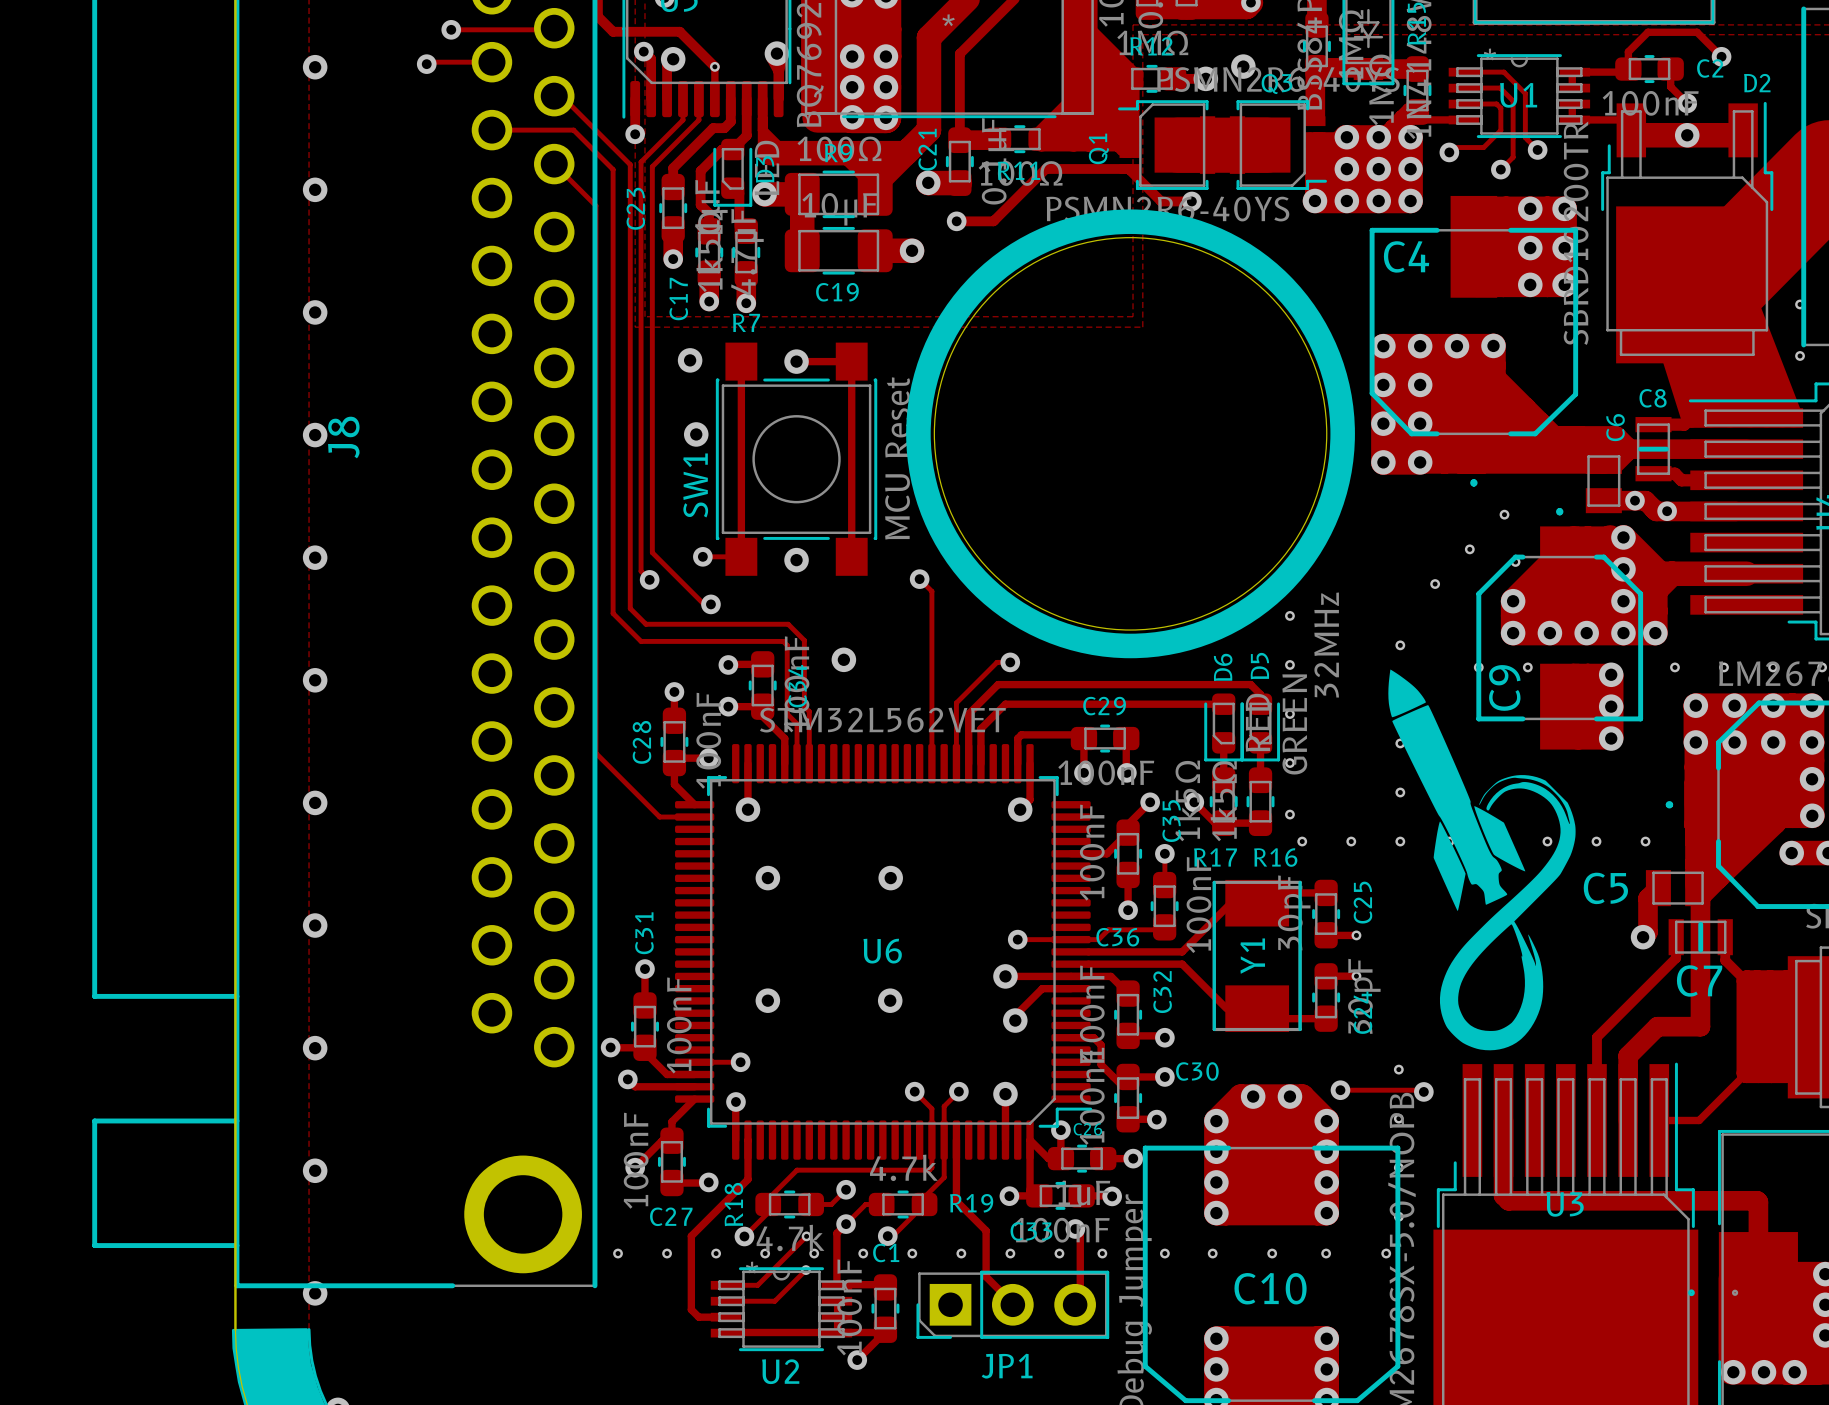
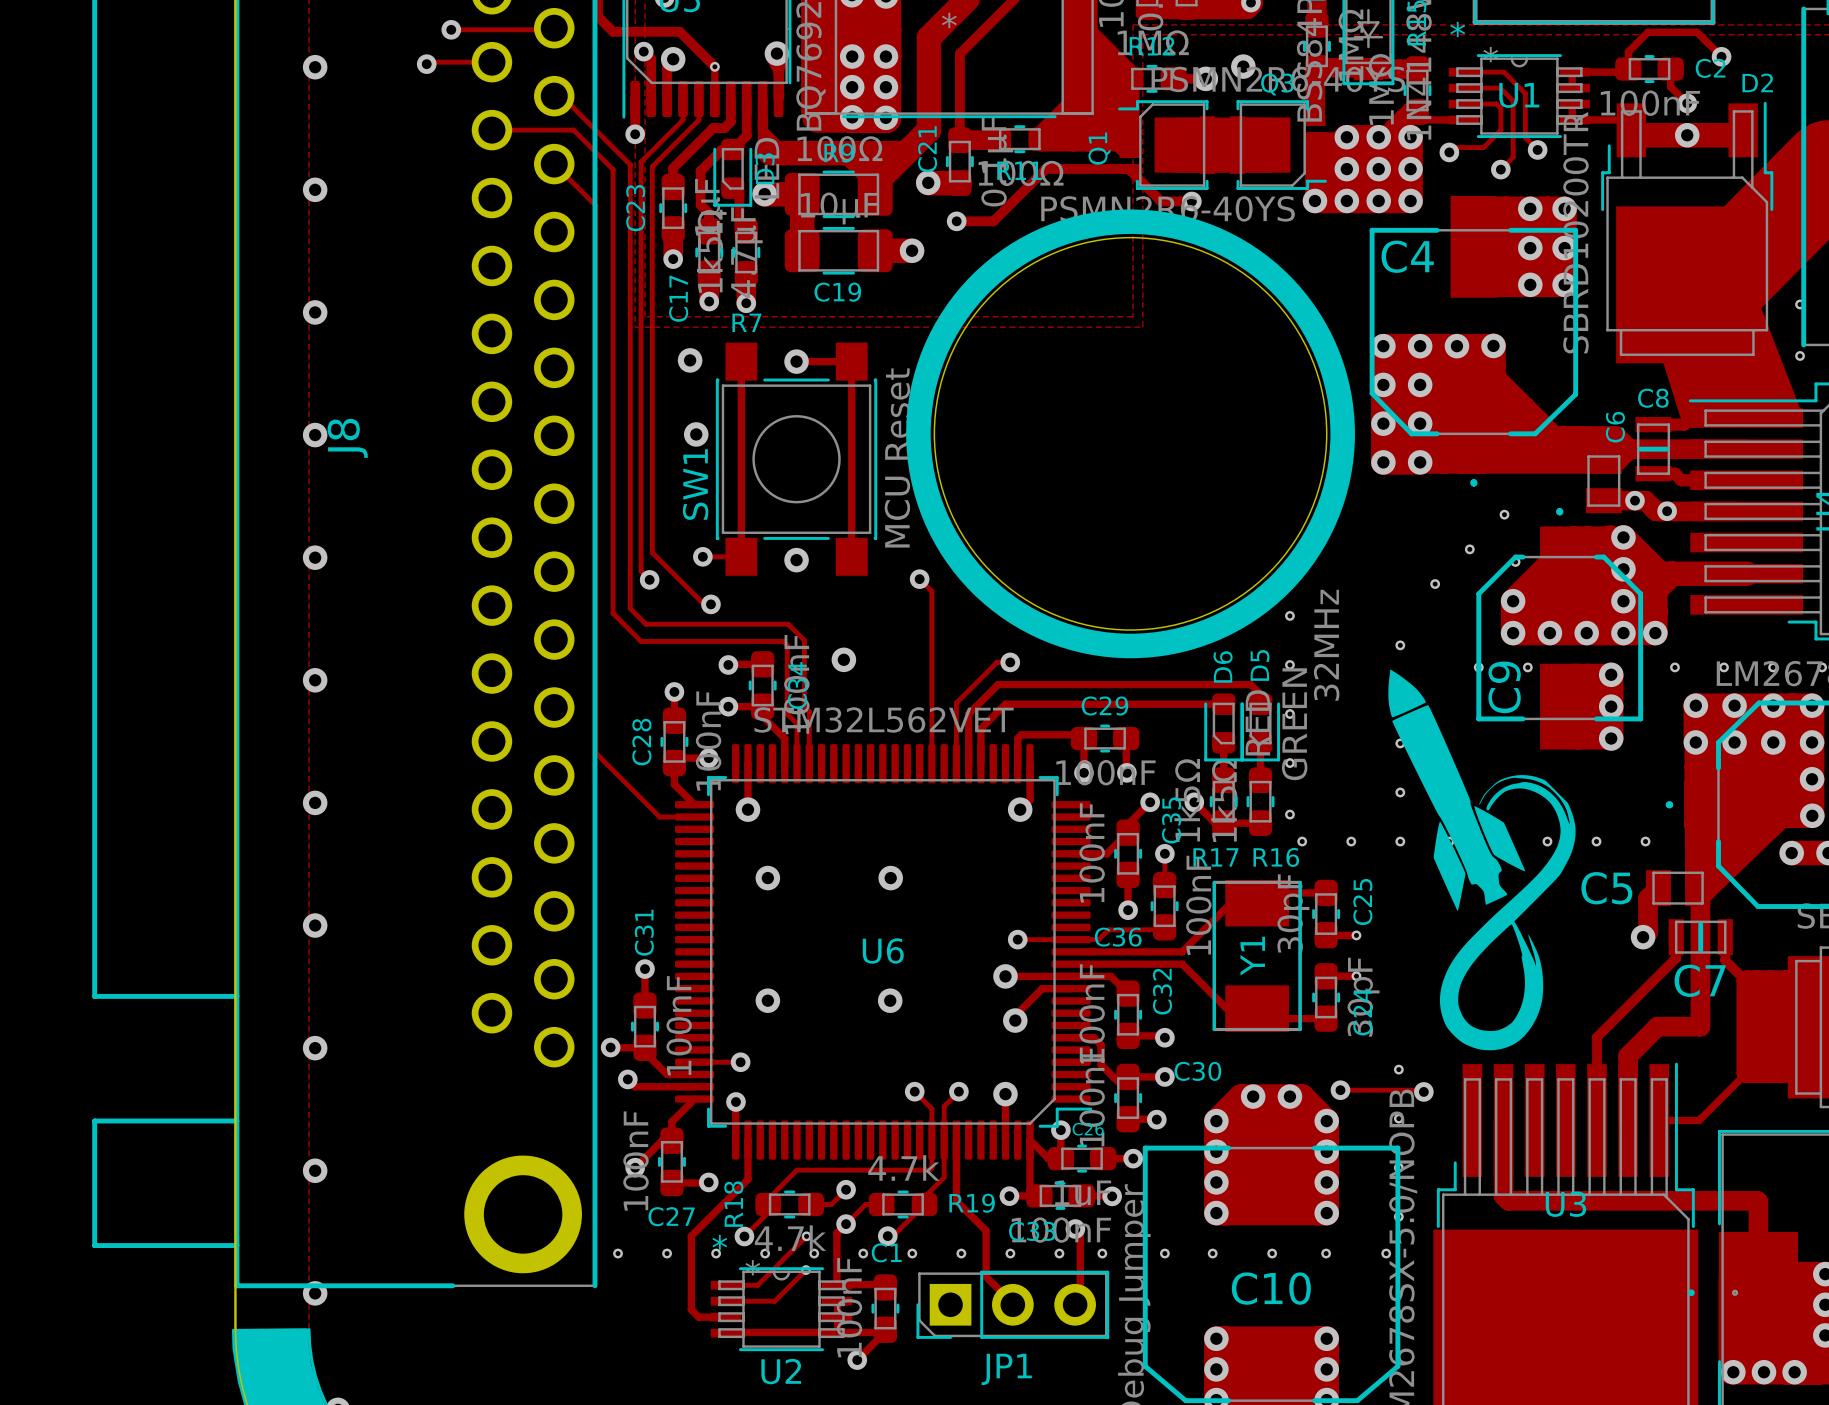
U1 text: none -> * (1457, 29)
U2 text: none -> * (719, 1242)

